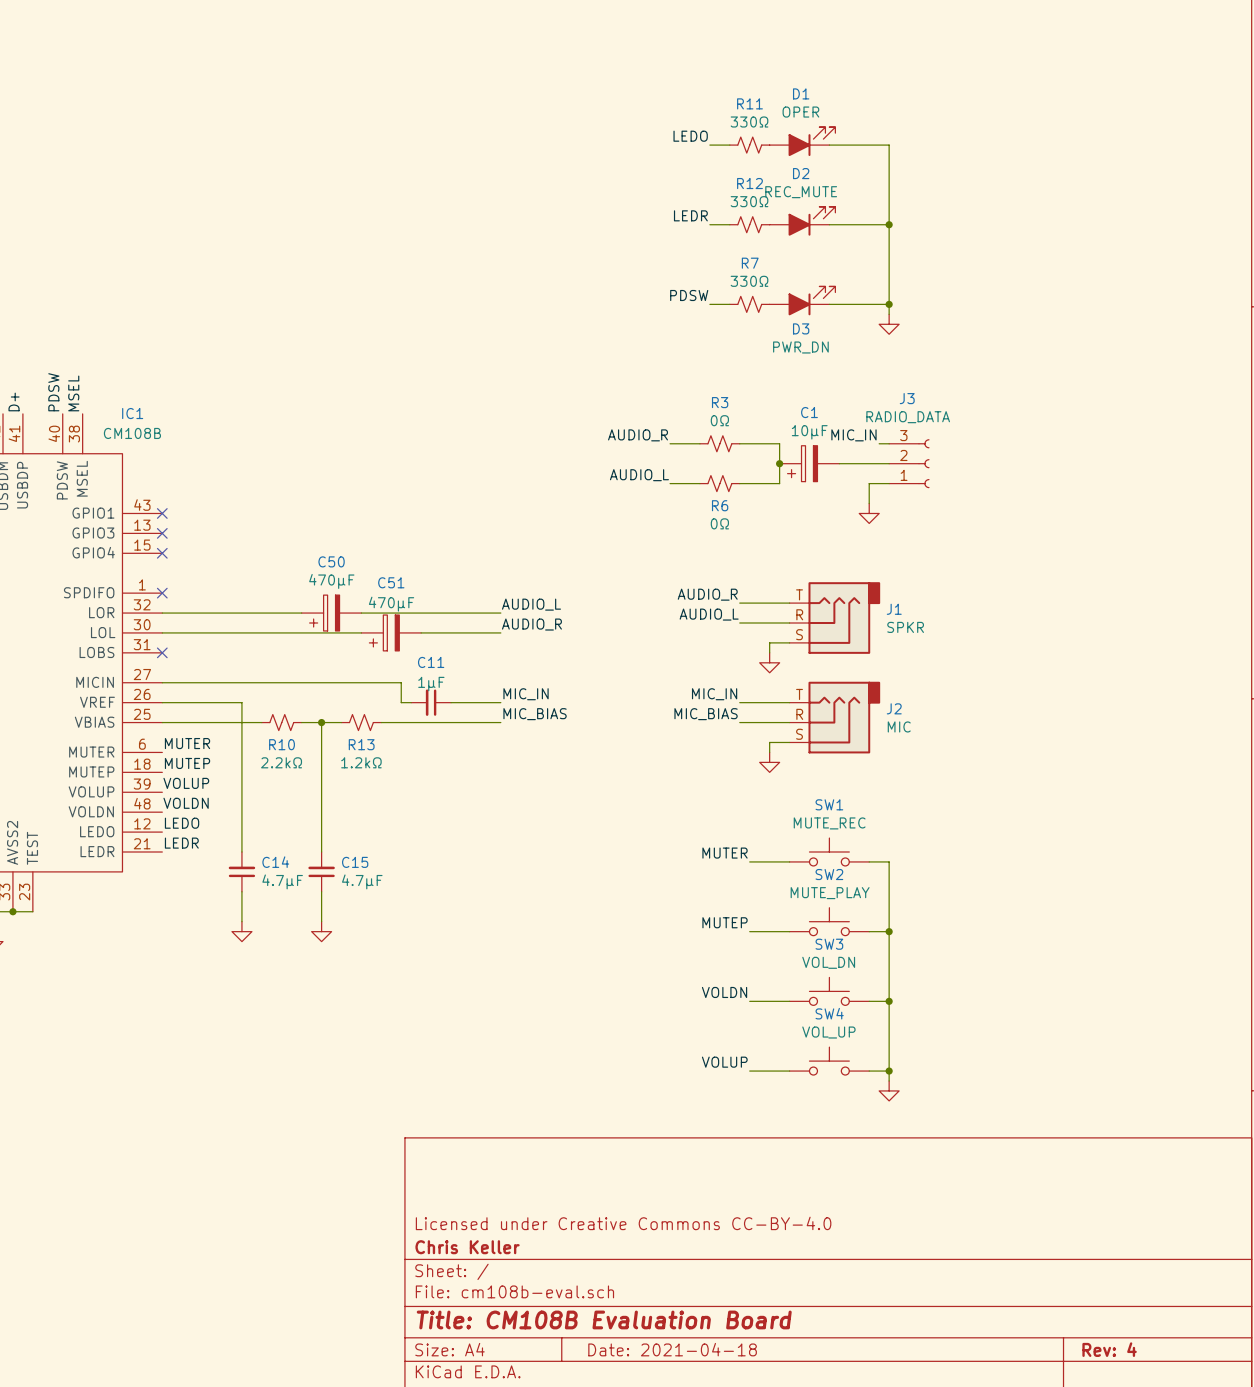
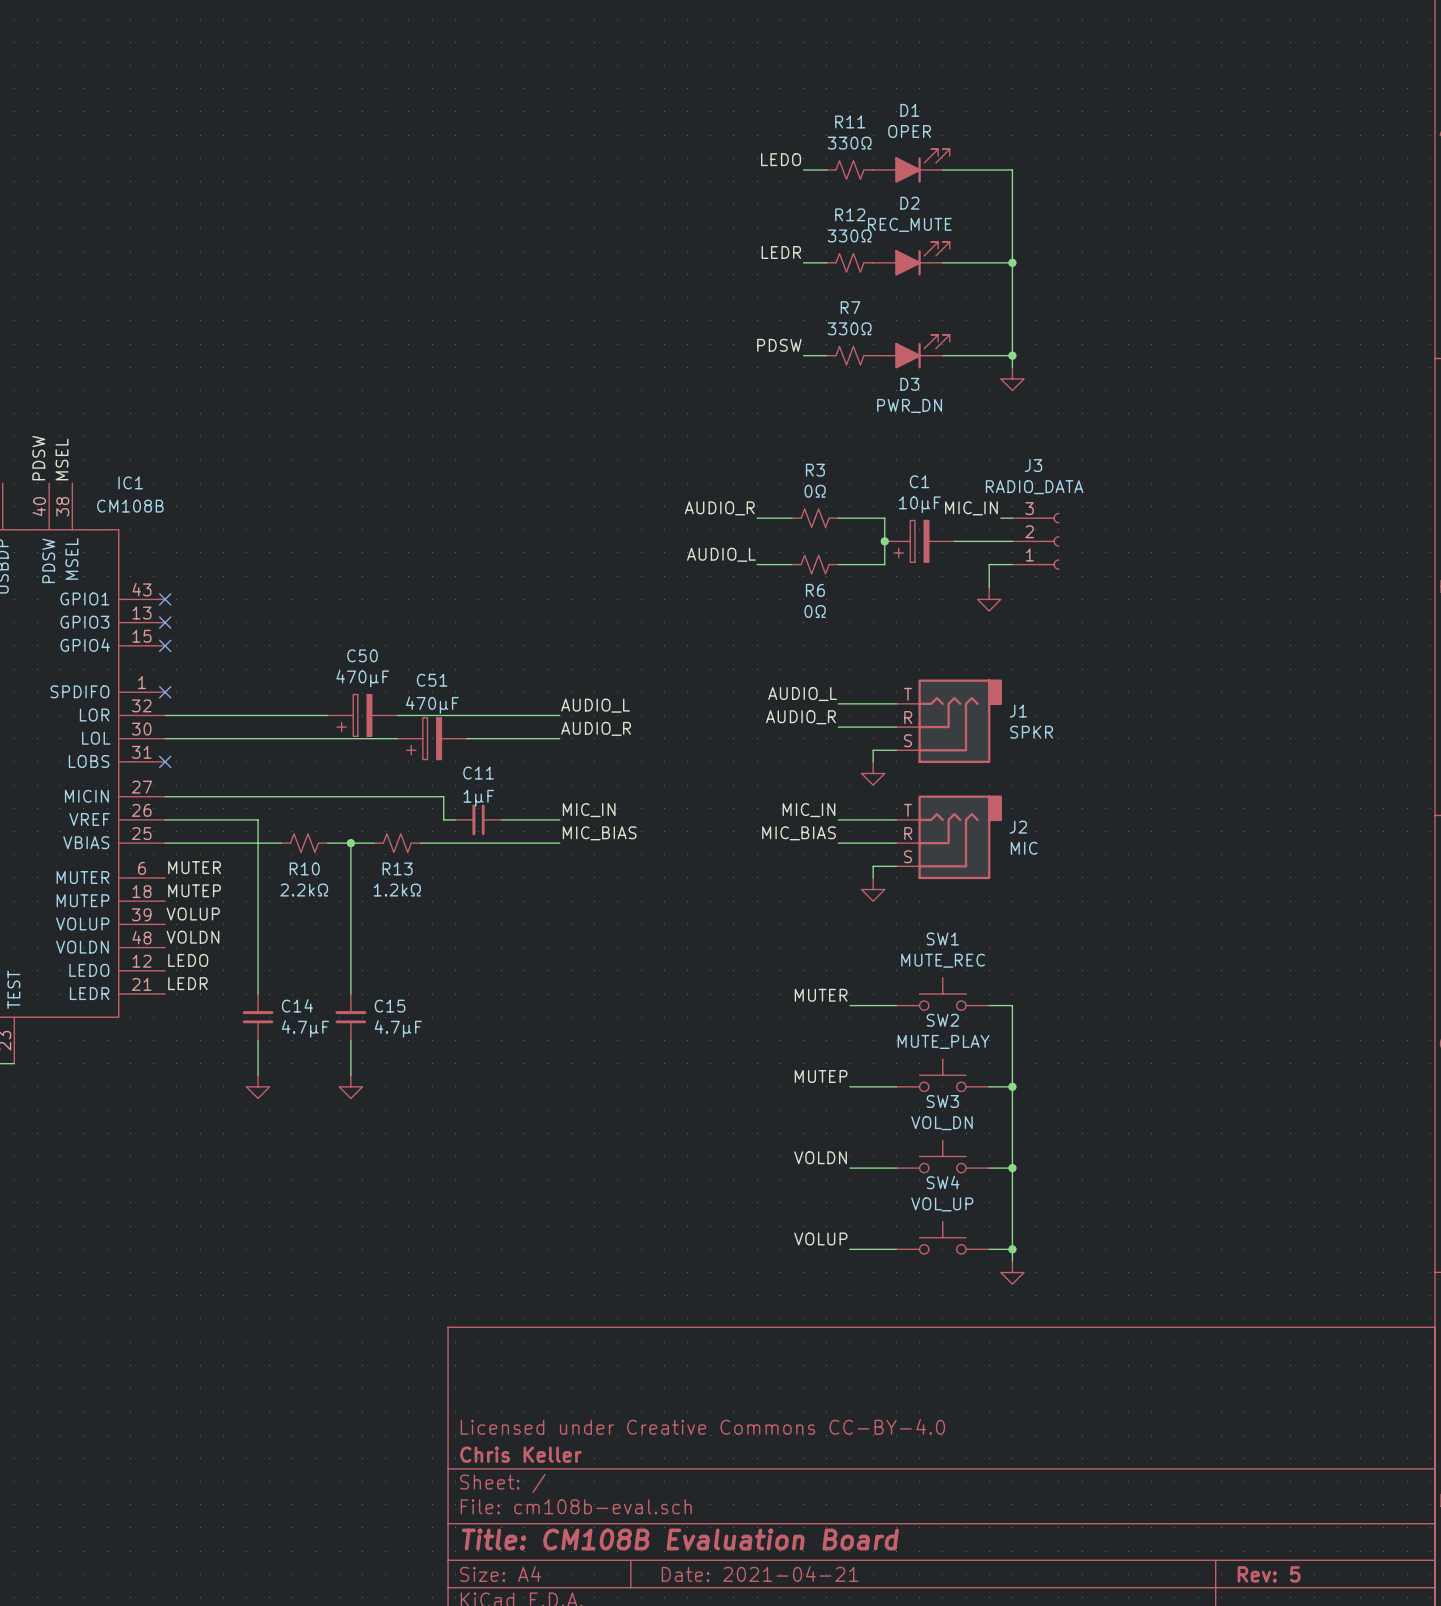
label: AUDIO_R (707, 594) -> AUDIO_L (802, 694)
label: AUDIO_L (709, 614) -> AUDIO_R (800, 717)
title block: Date: 2021-04-18 (672, 1349) -> Date: 2021-04-21 (760, 1574)
title block: Rev: 4 (1109, 1349) -> Rev: 5 (1269, 1574)

